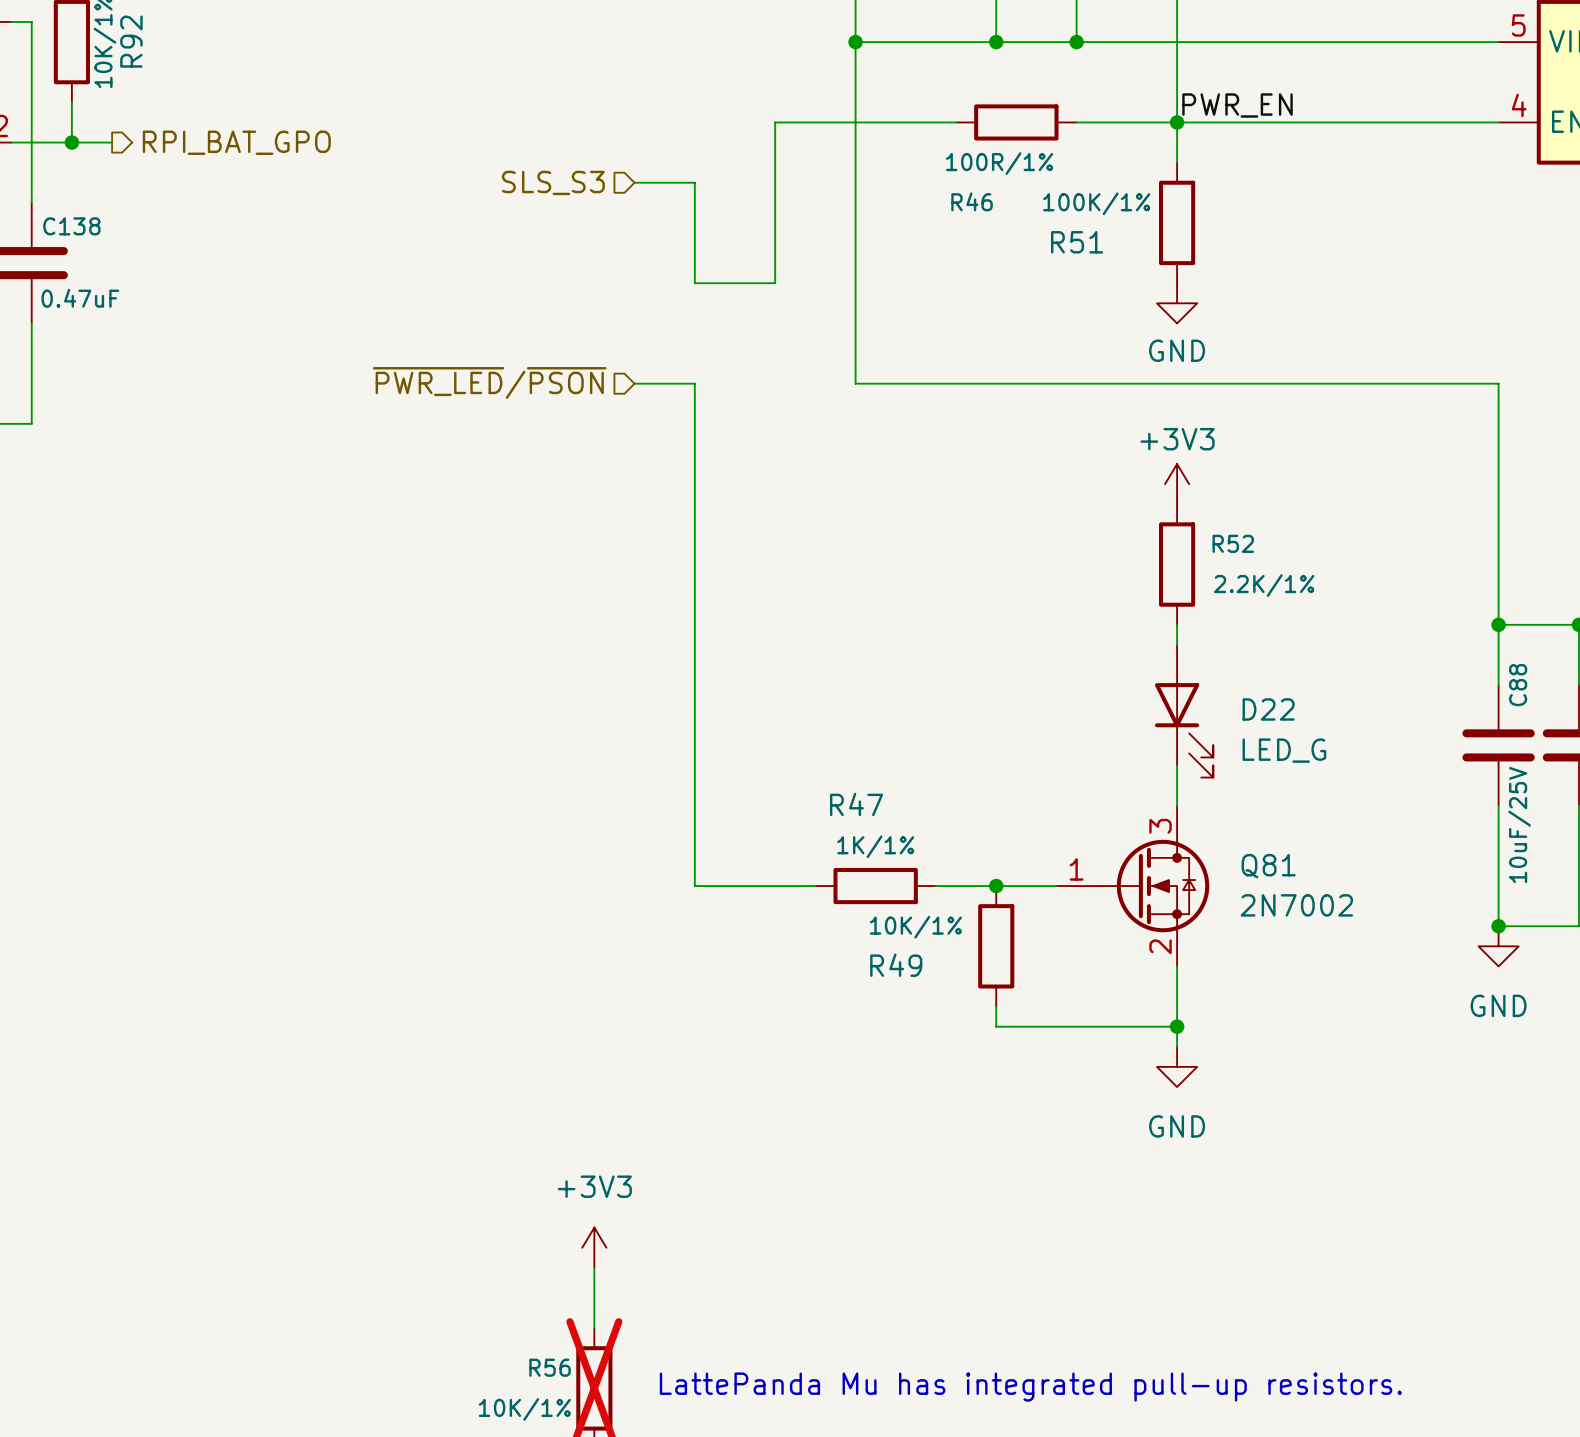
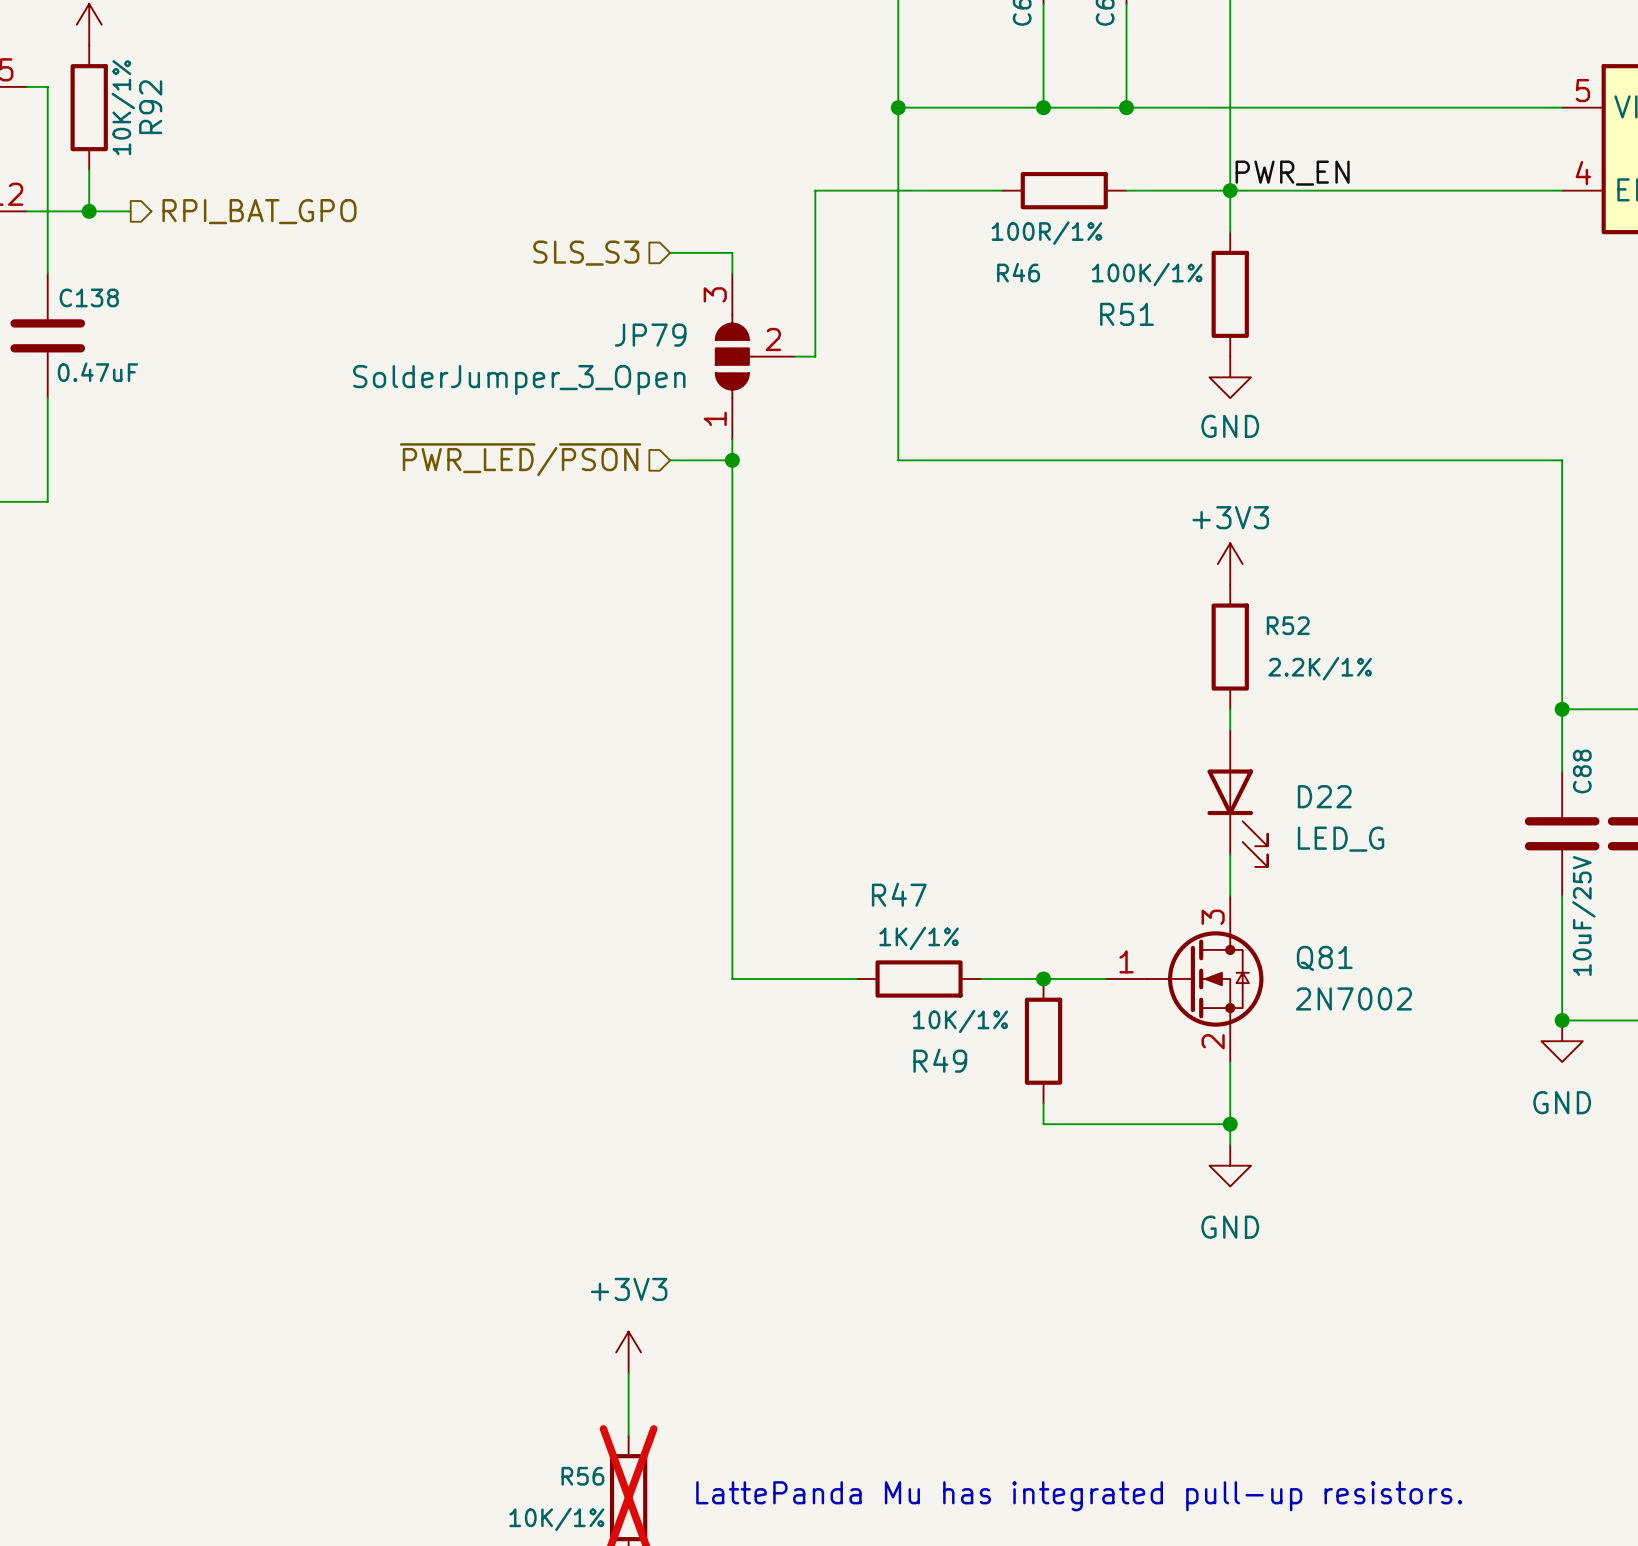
JP79: none -> SolderJumper_3_Open (755, 356)
wire: none -> (732, 439) (732, 460)
junction: none -> (732, 460)

